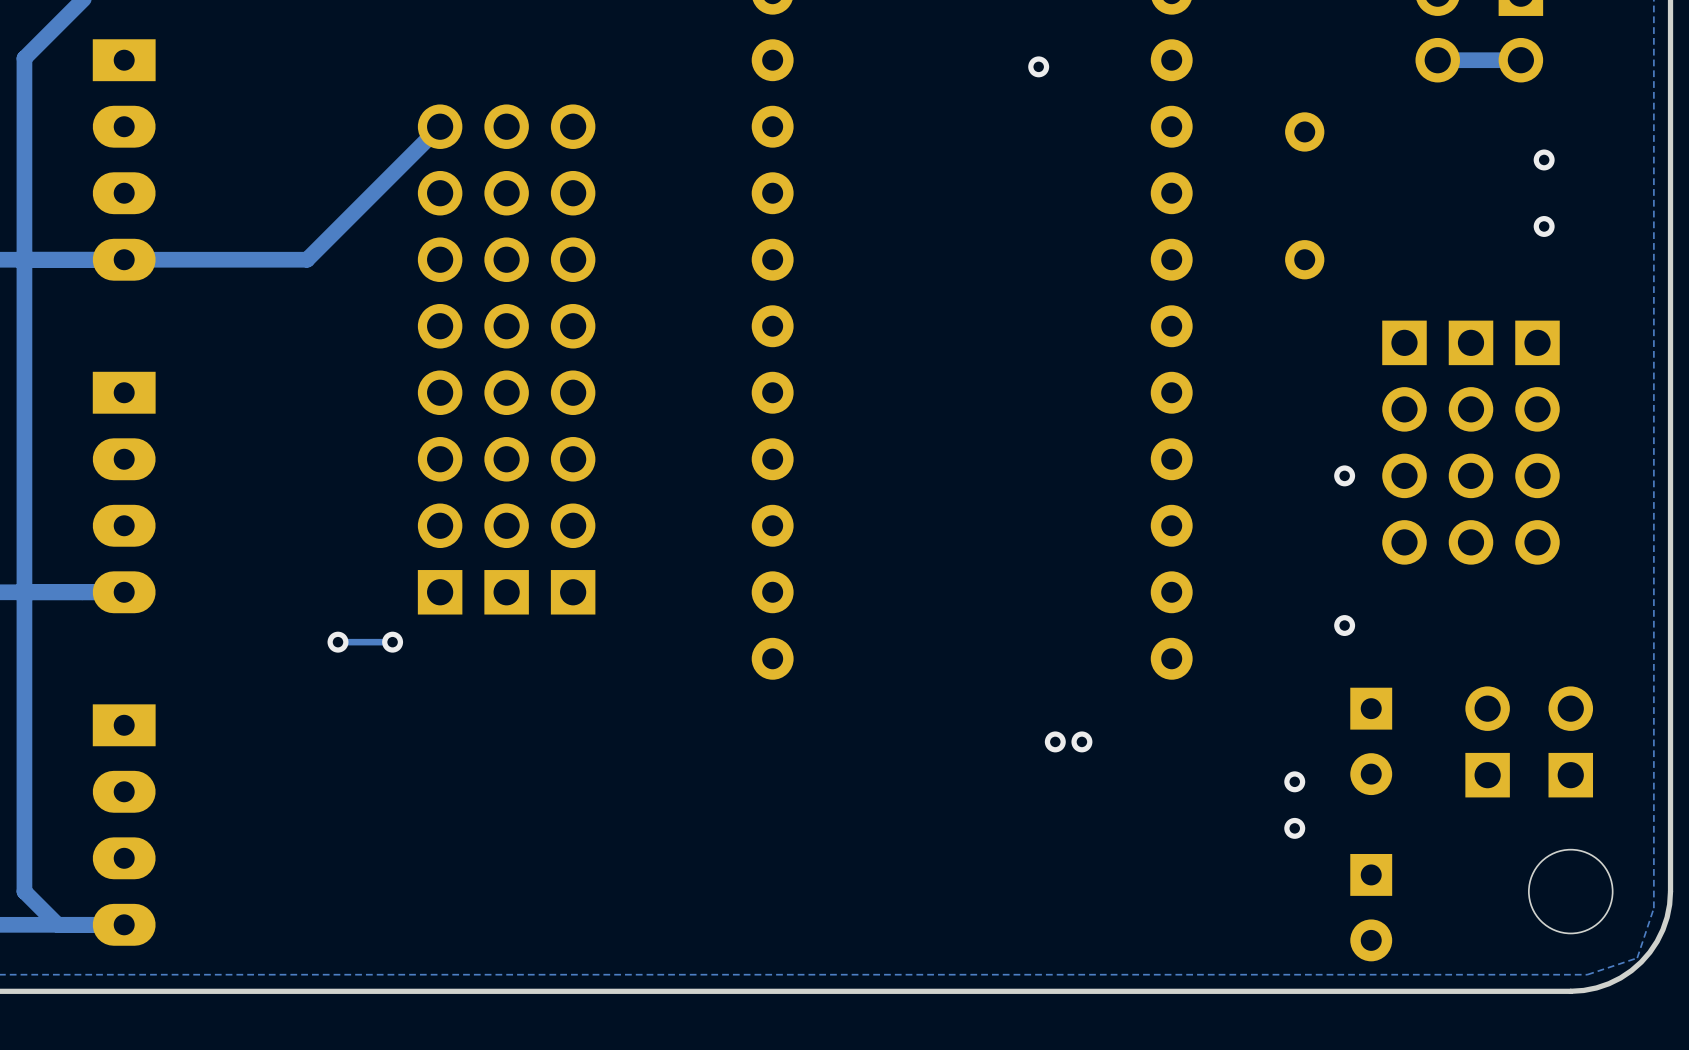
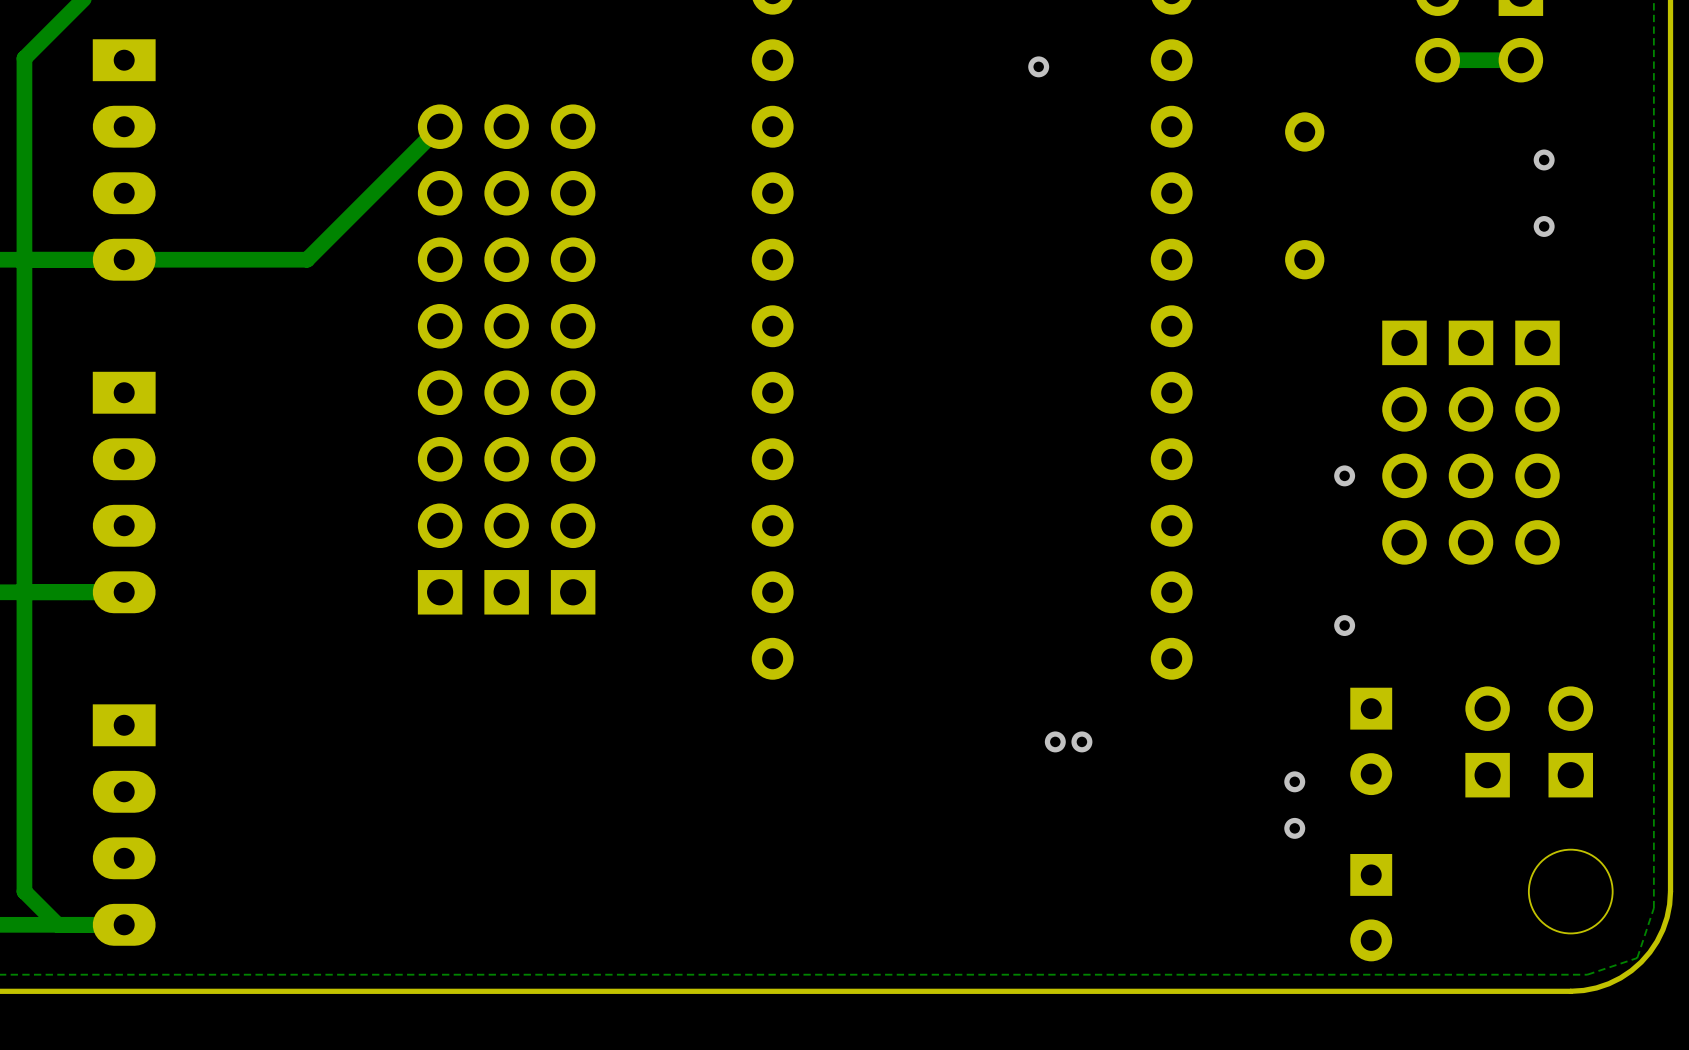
via: (338, 642) -> none
track: (392, 642) (338, 642) -> none
via: (392, 642) -> none

